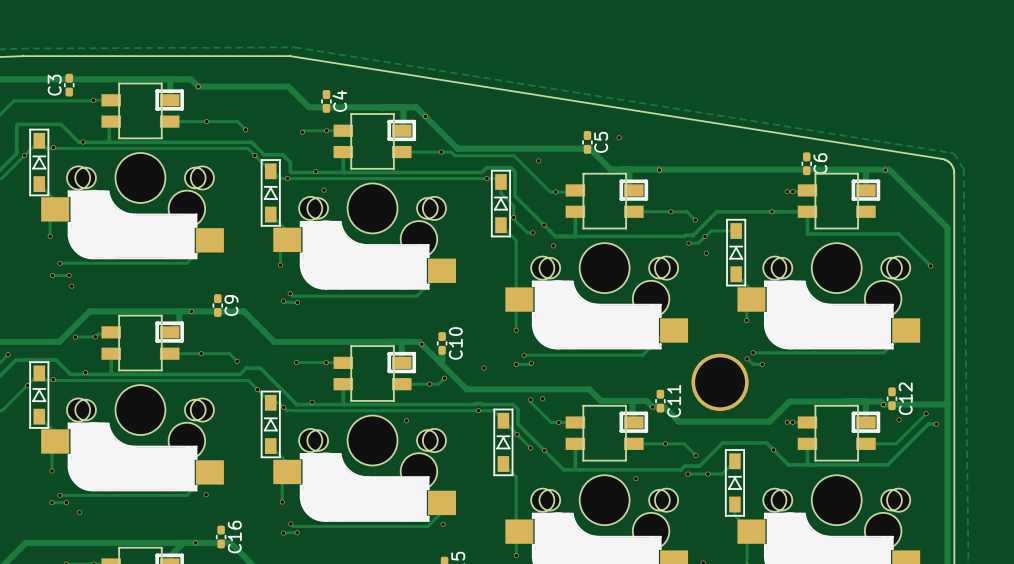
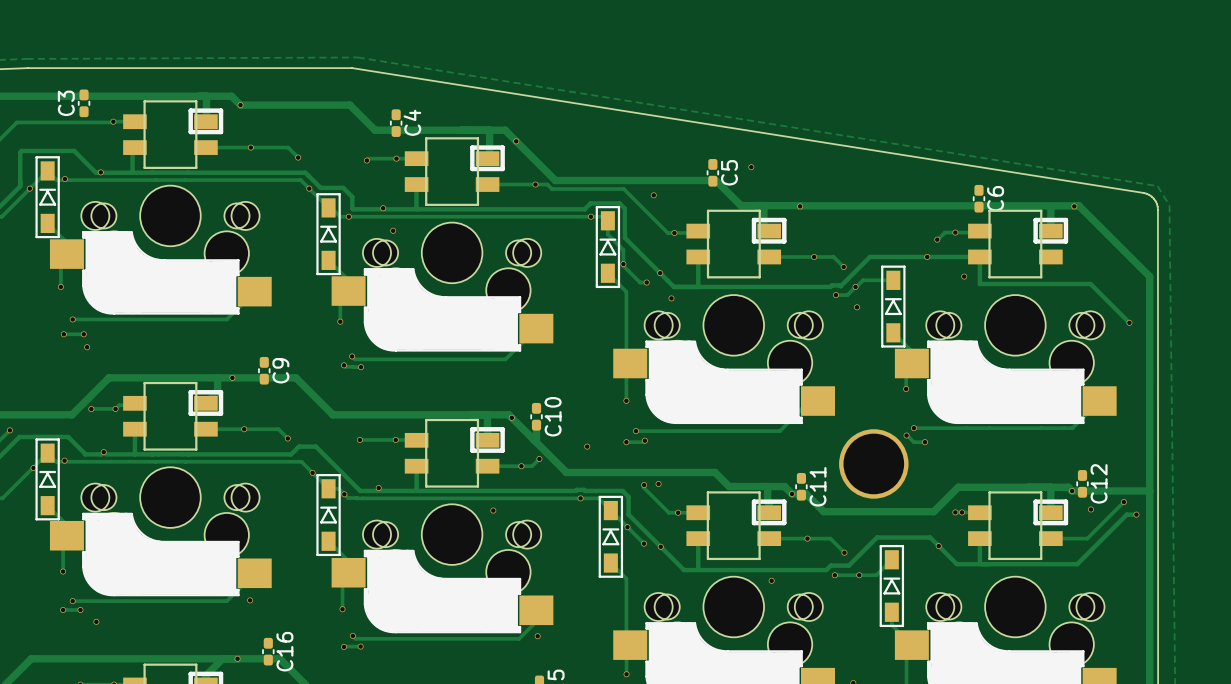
track: none -> (955, 232) (944, 232) (937, 239)
via: (792, 191) -> none
via: none -> (937, 239)
via: none -> (927, 256)
via: (772, 211) -> none
via: none -> (964, 276)

